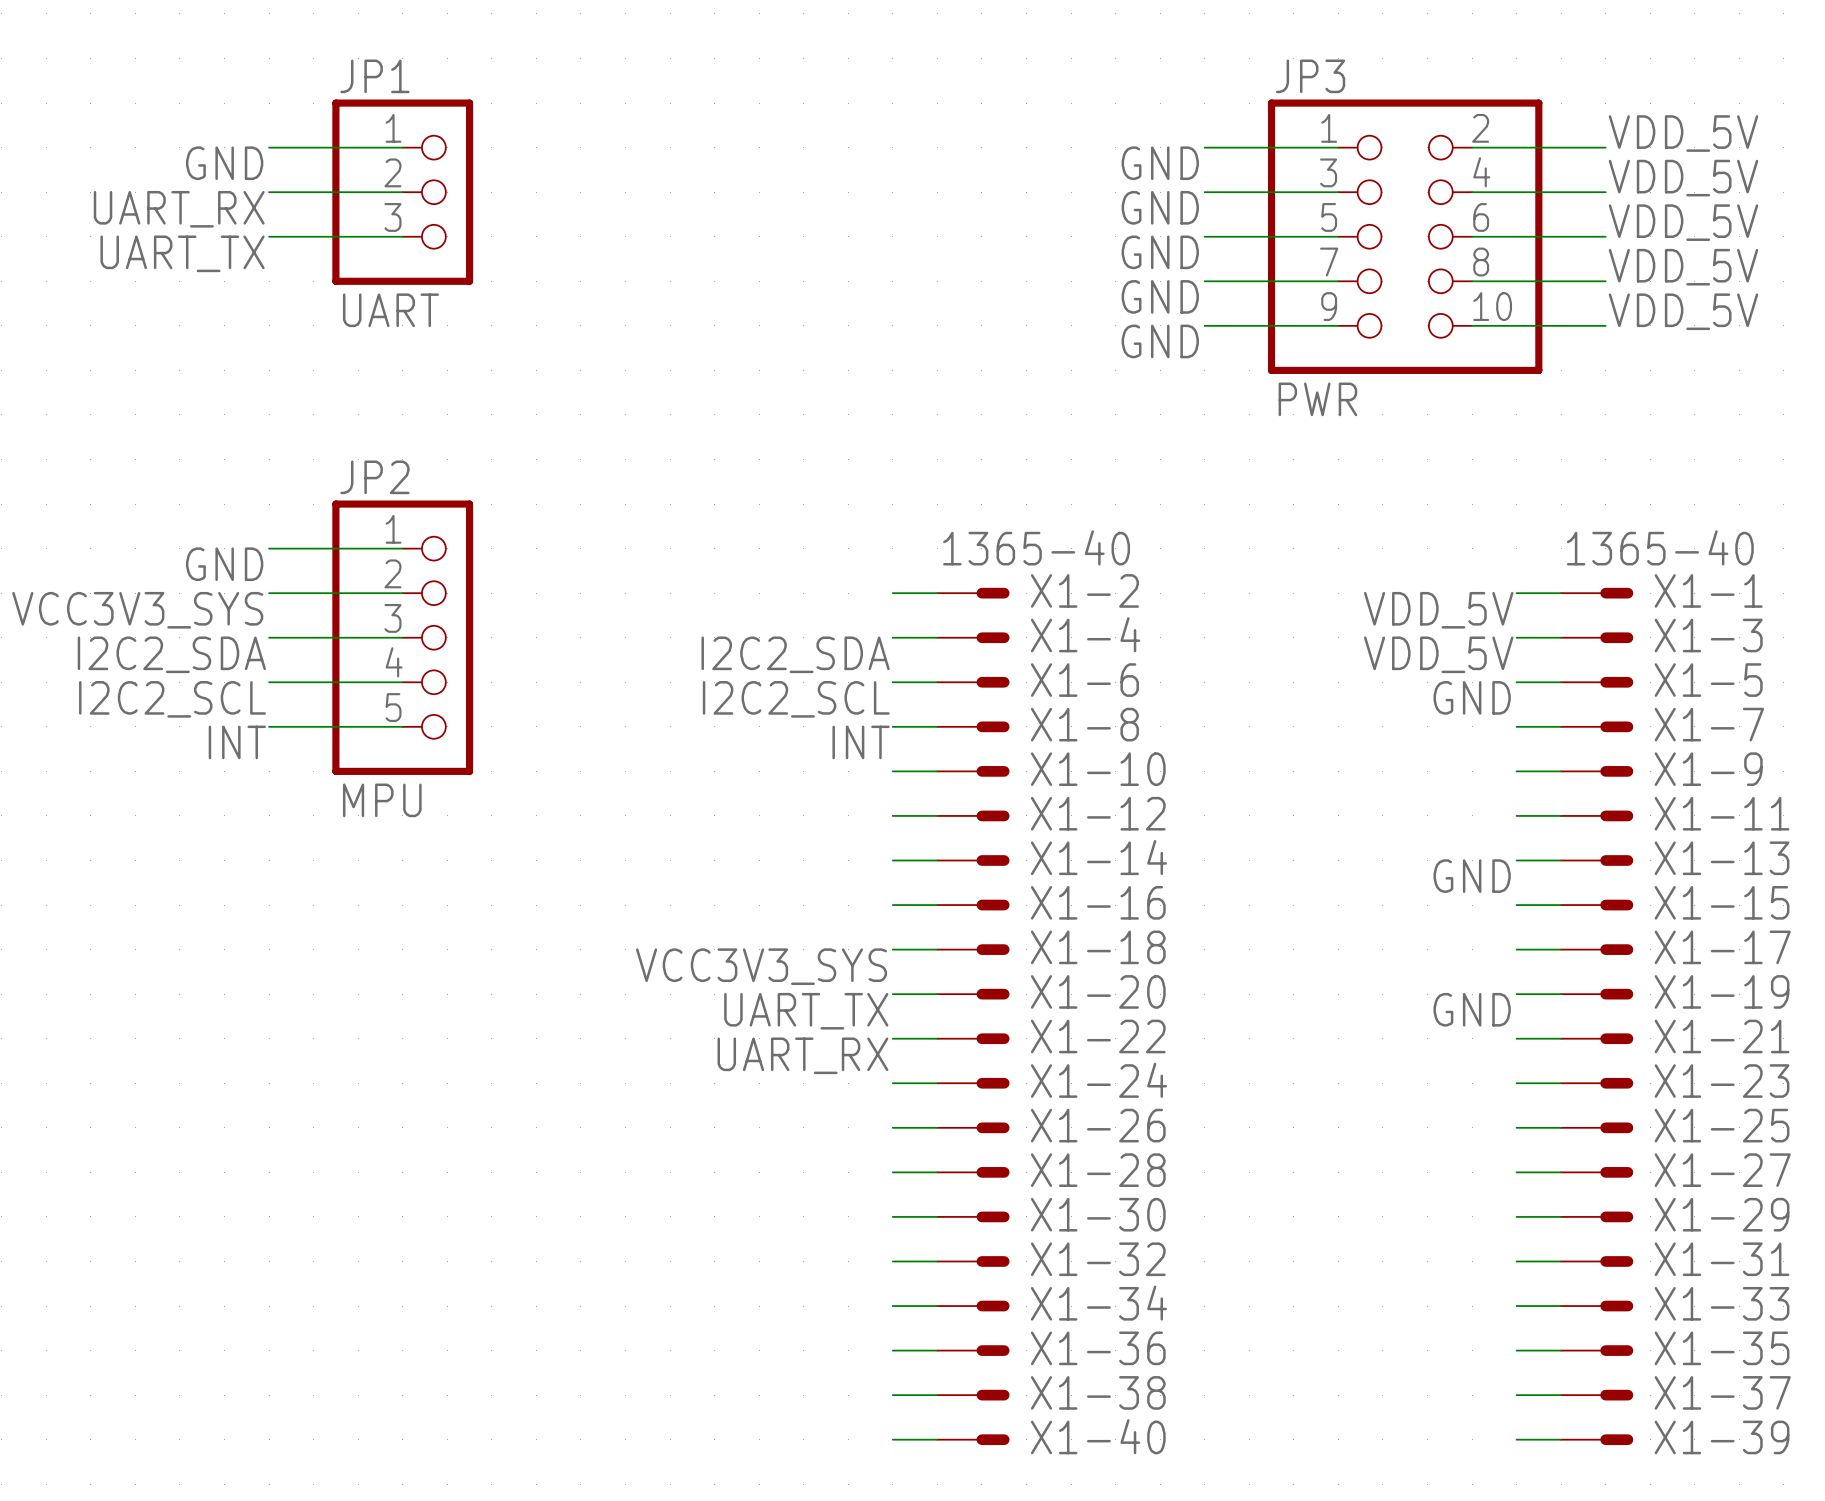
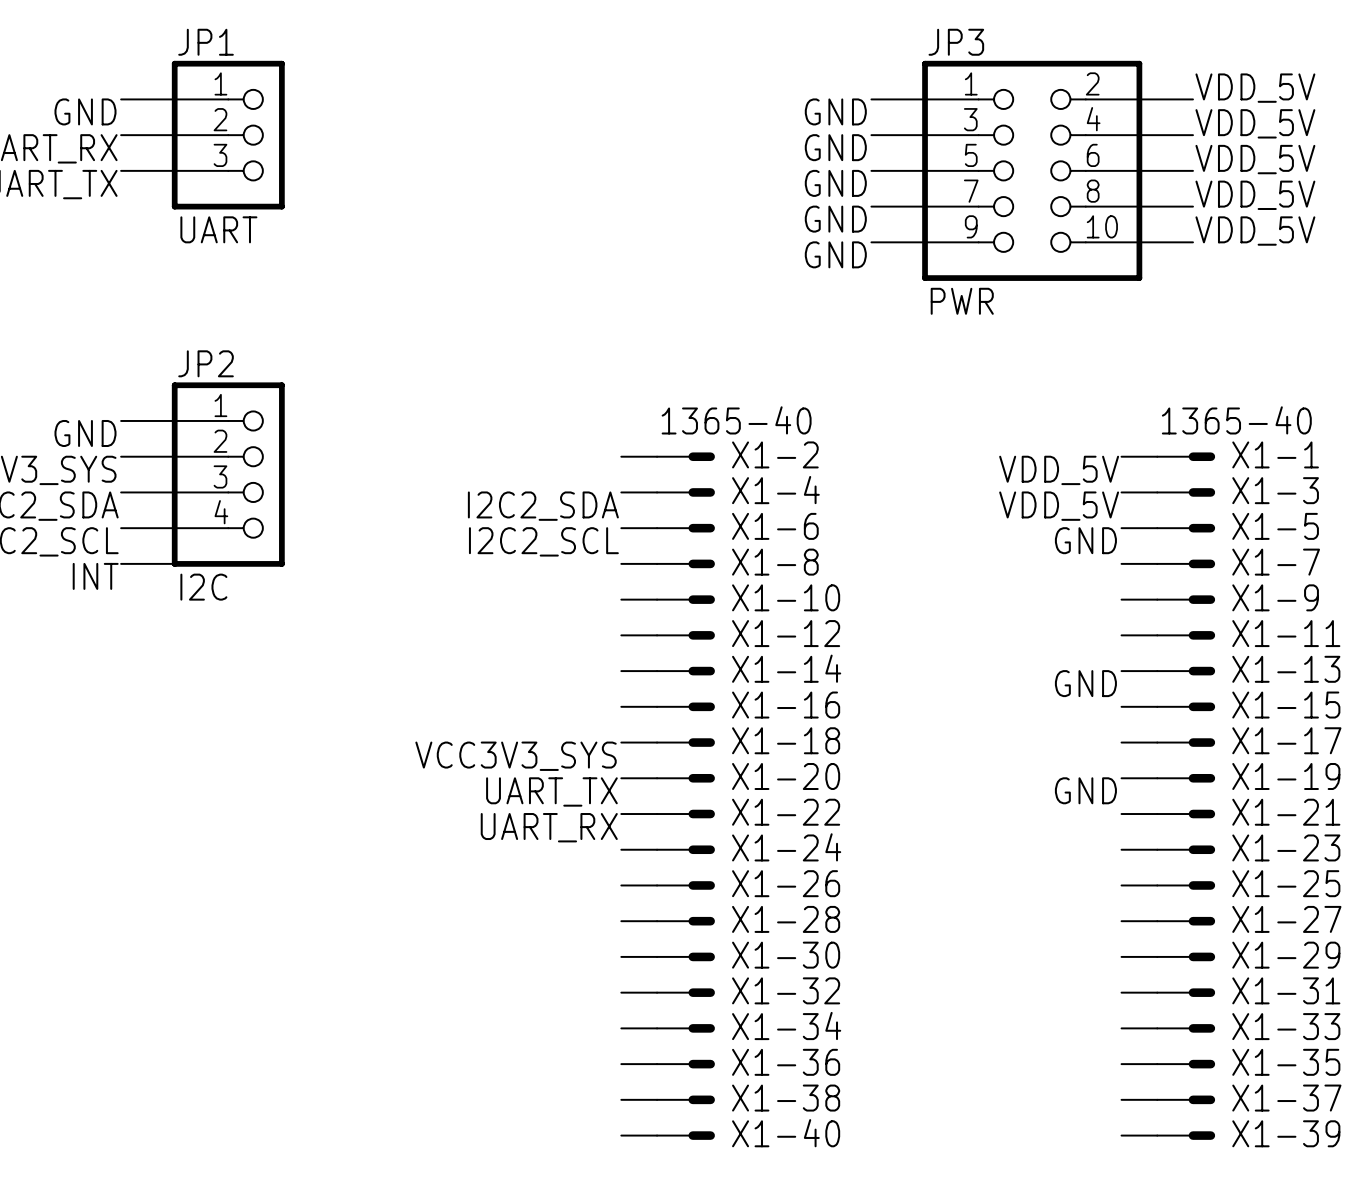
JP2 symbol: [332, 500, 474, 775] -> [171, 382, 285, 567]
label: INT (861, 742) -> none
JP2 value: MPU (382, 800) -> I2C (203, 587)

